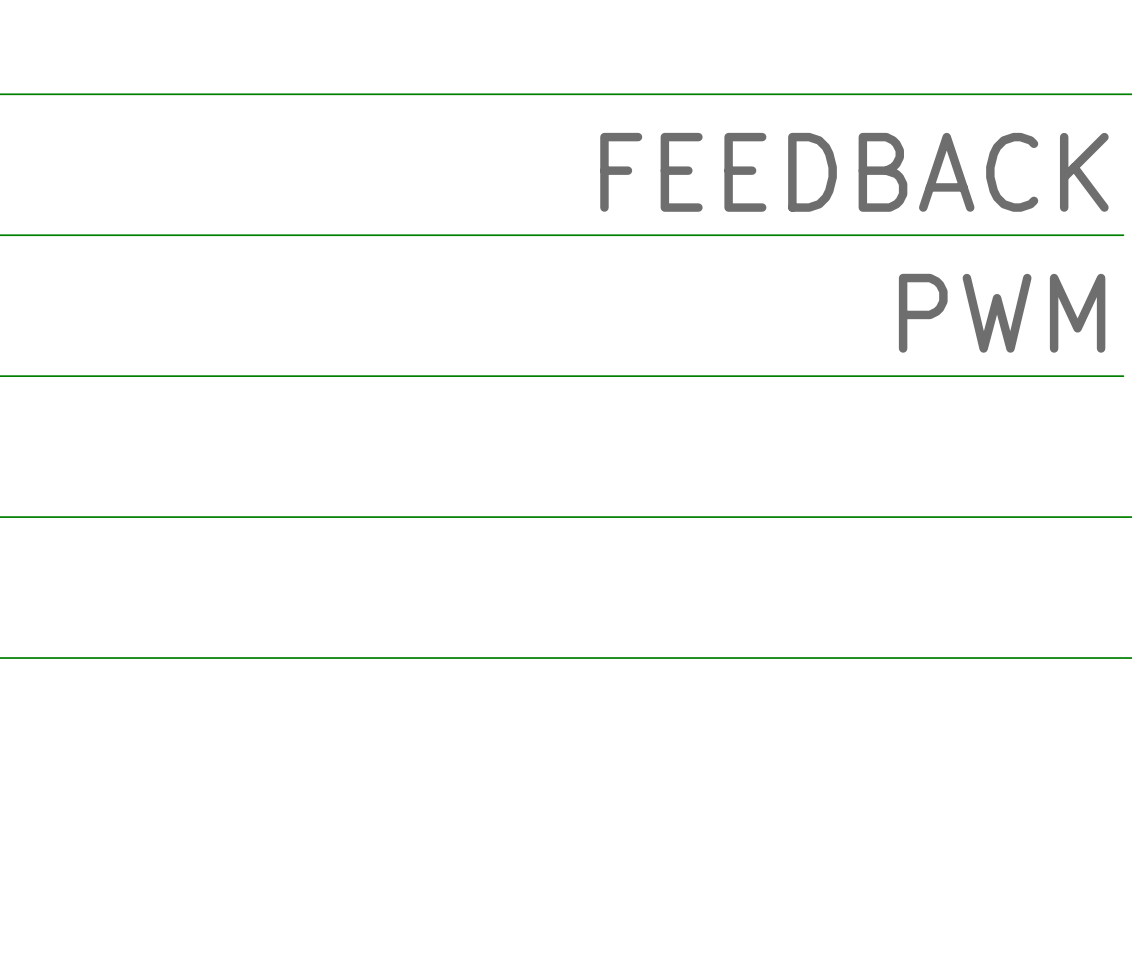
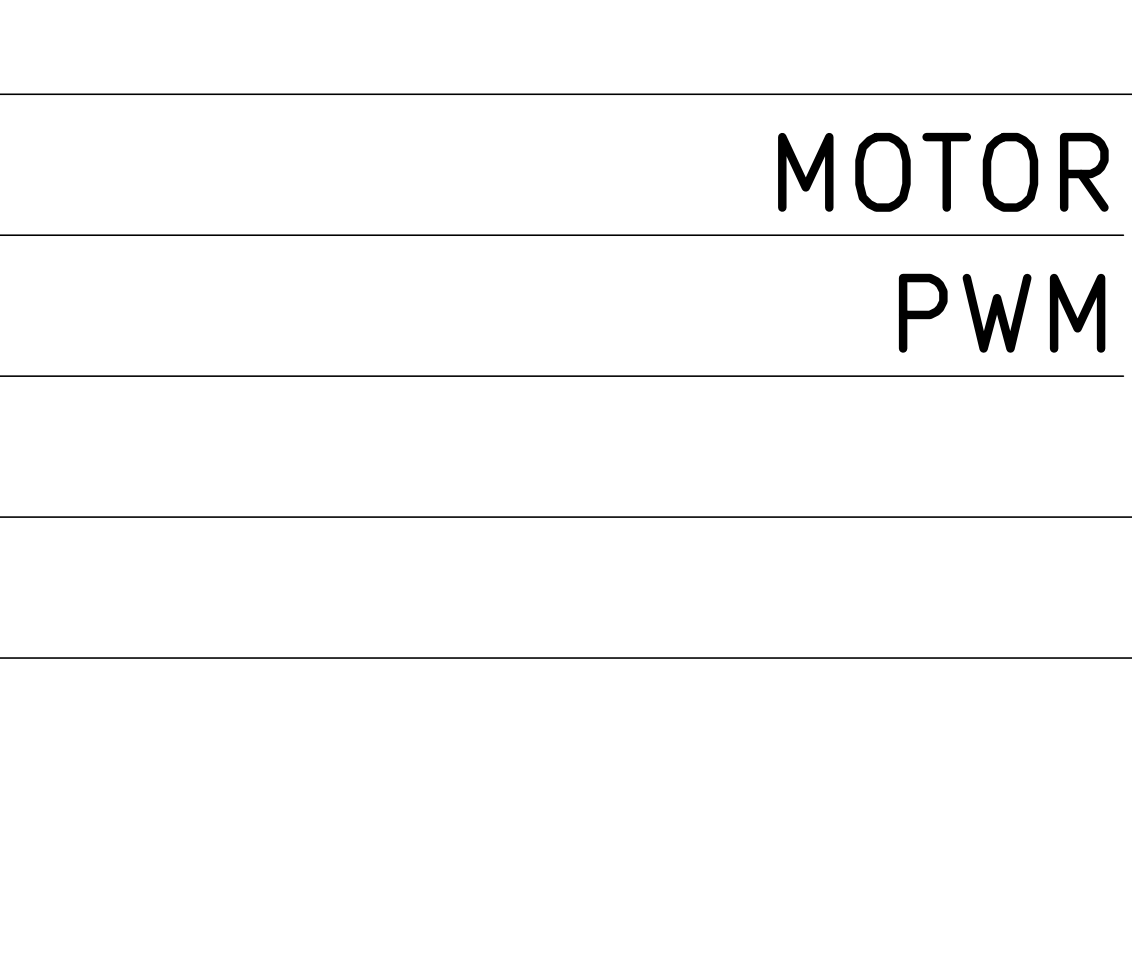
label: FEEDBACK (854, 172) -> MOTOR (943, 172)

